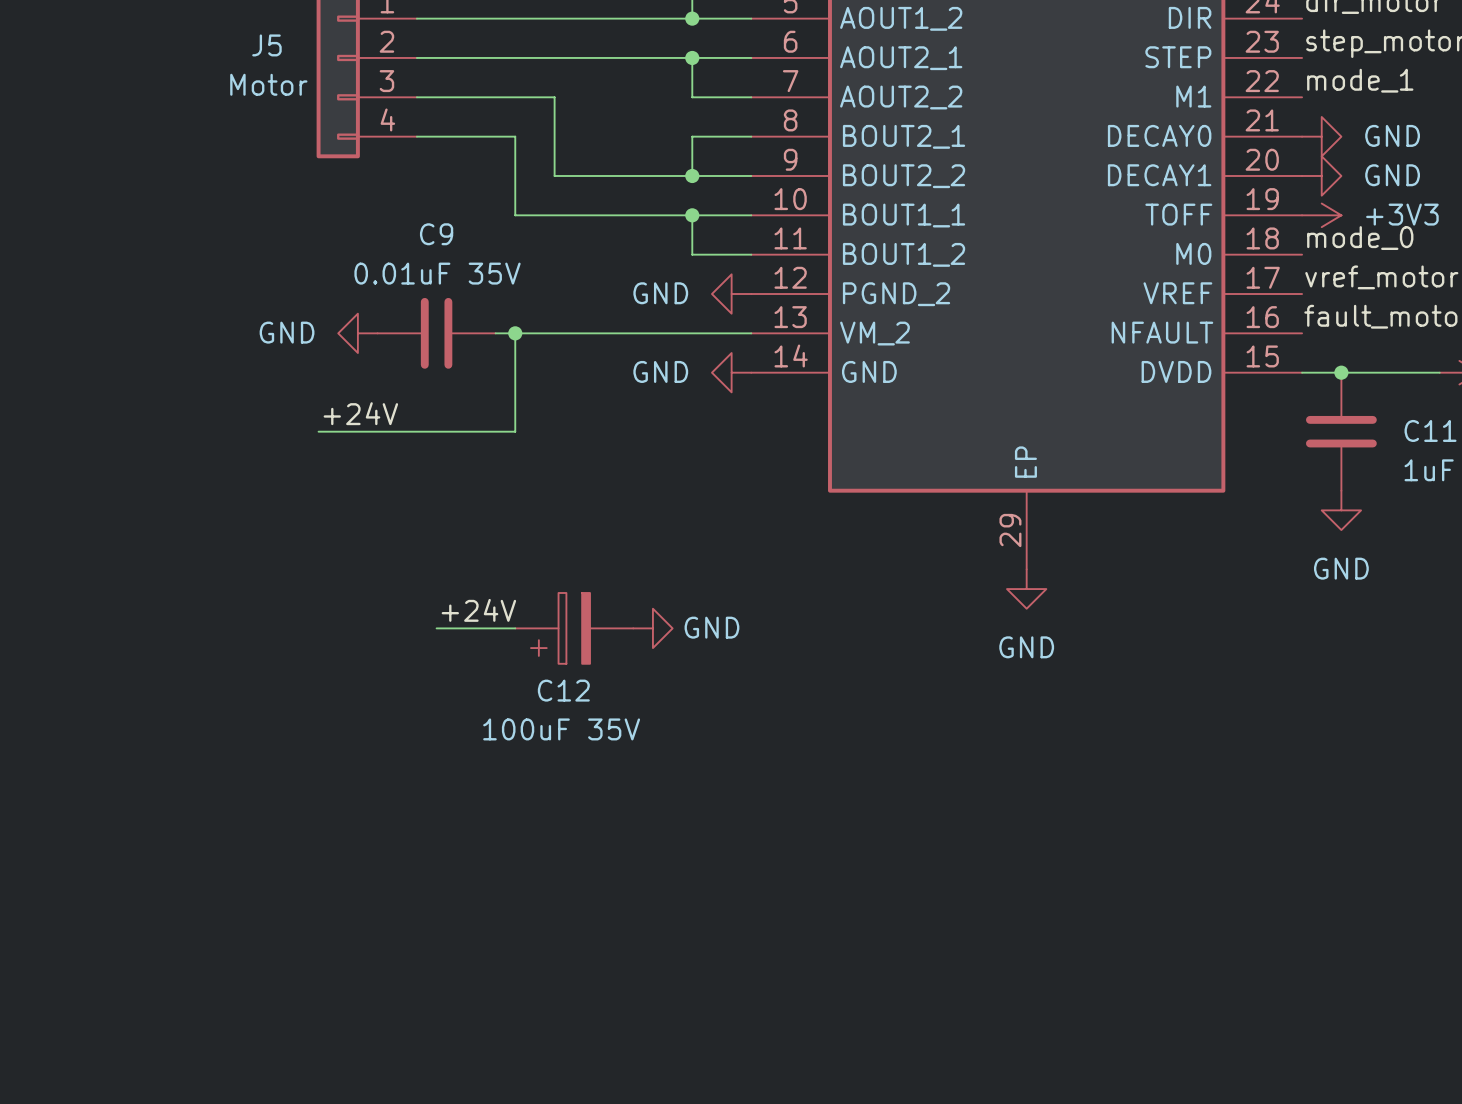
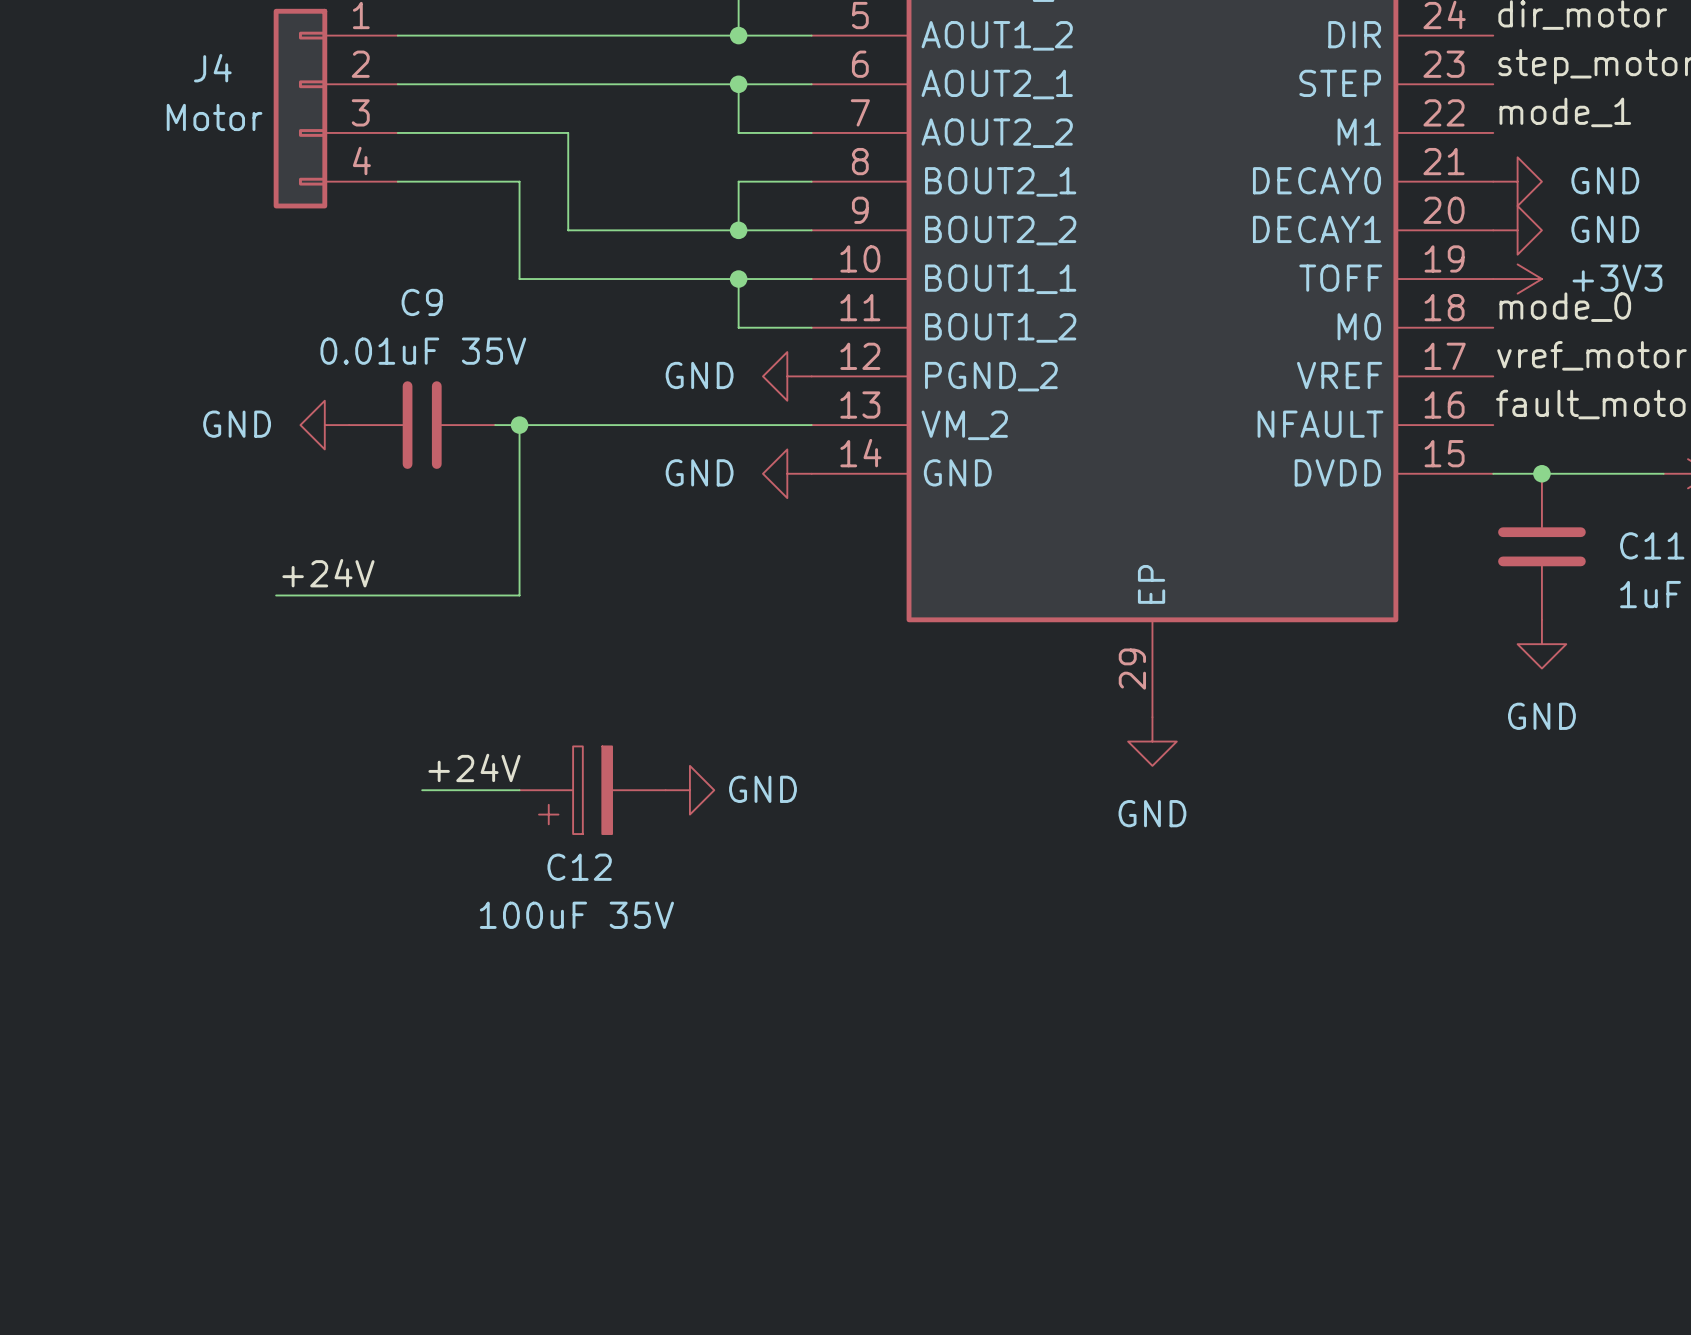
J5 name: J5 (266, 45) -> J4 (212, 68)
label position: +24V (360, 413) -> +24V (328, 573)
wire: (318, 431) (515, 431) -> (276, 595) (519, 595) (519, 546)

